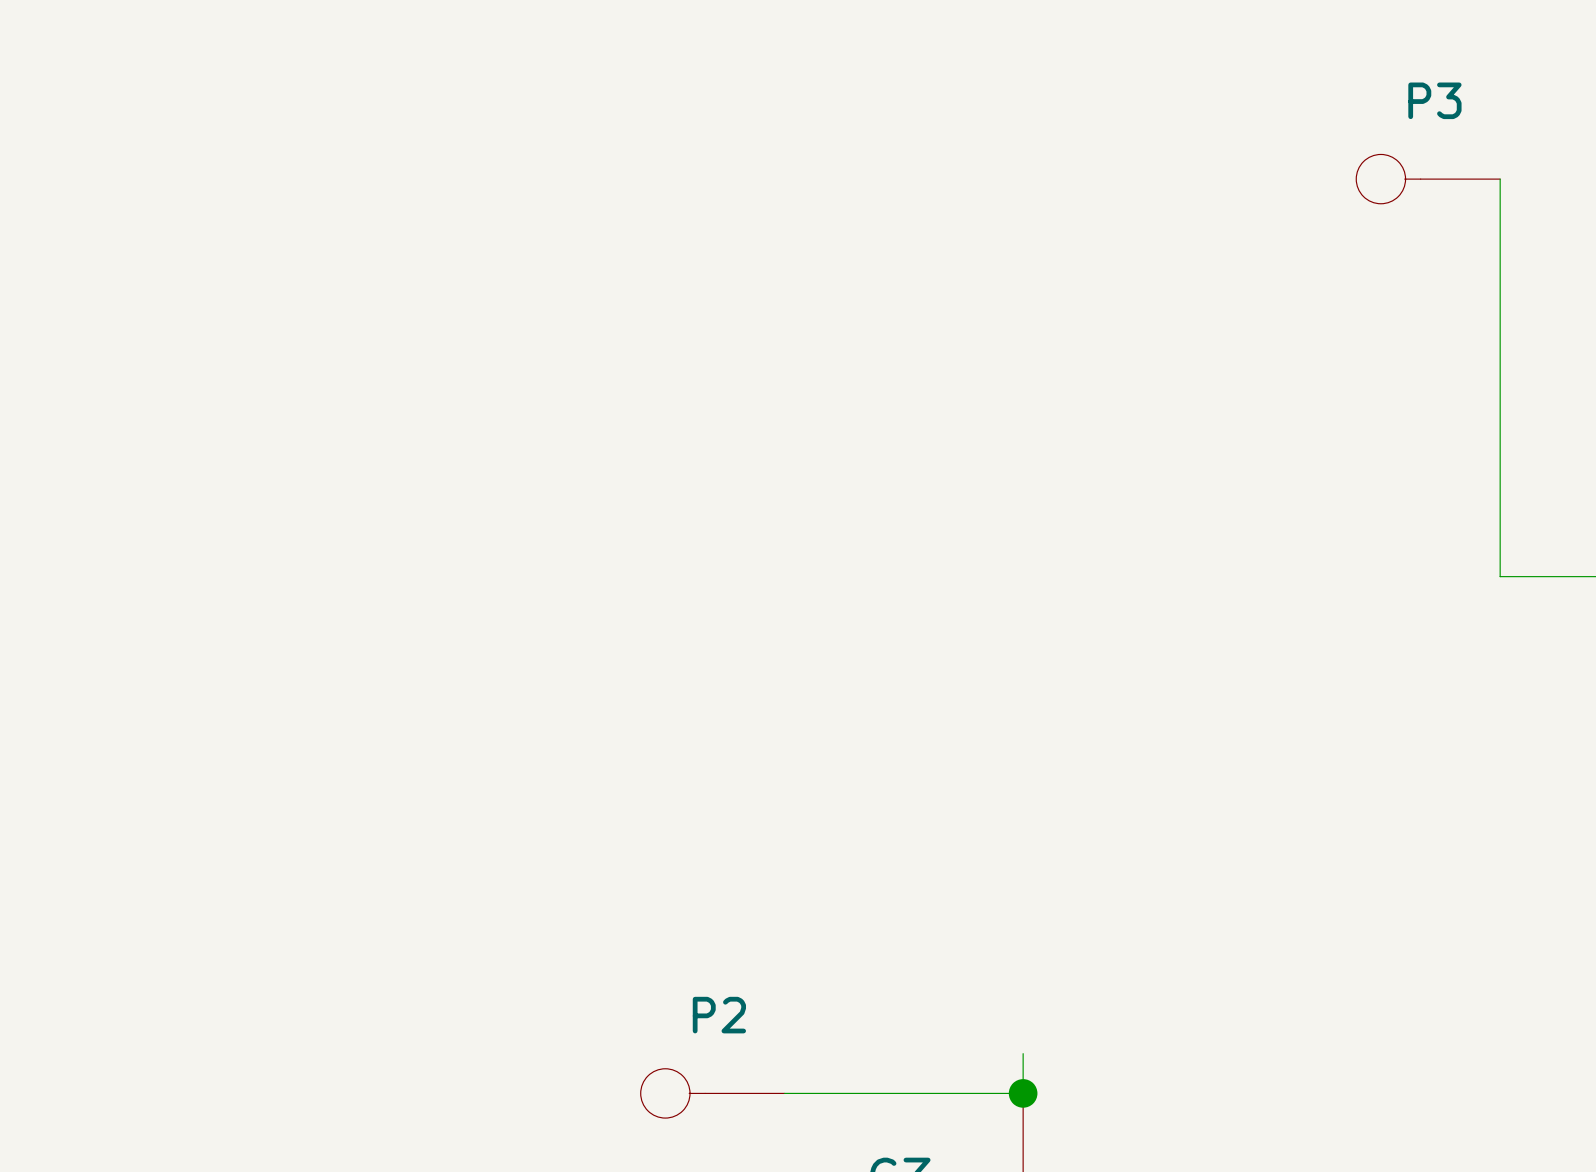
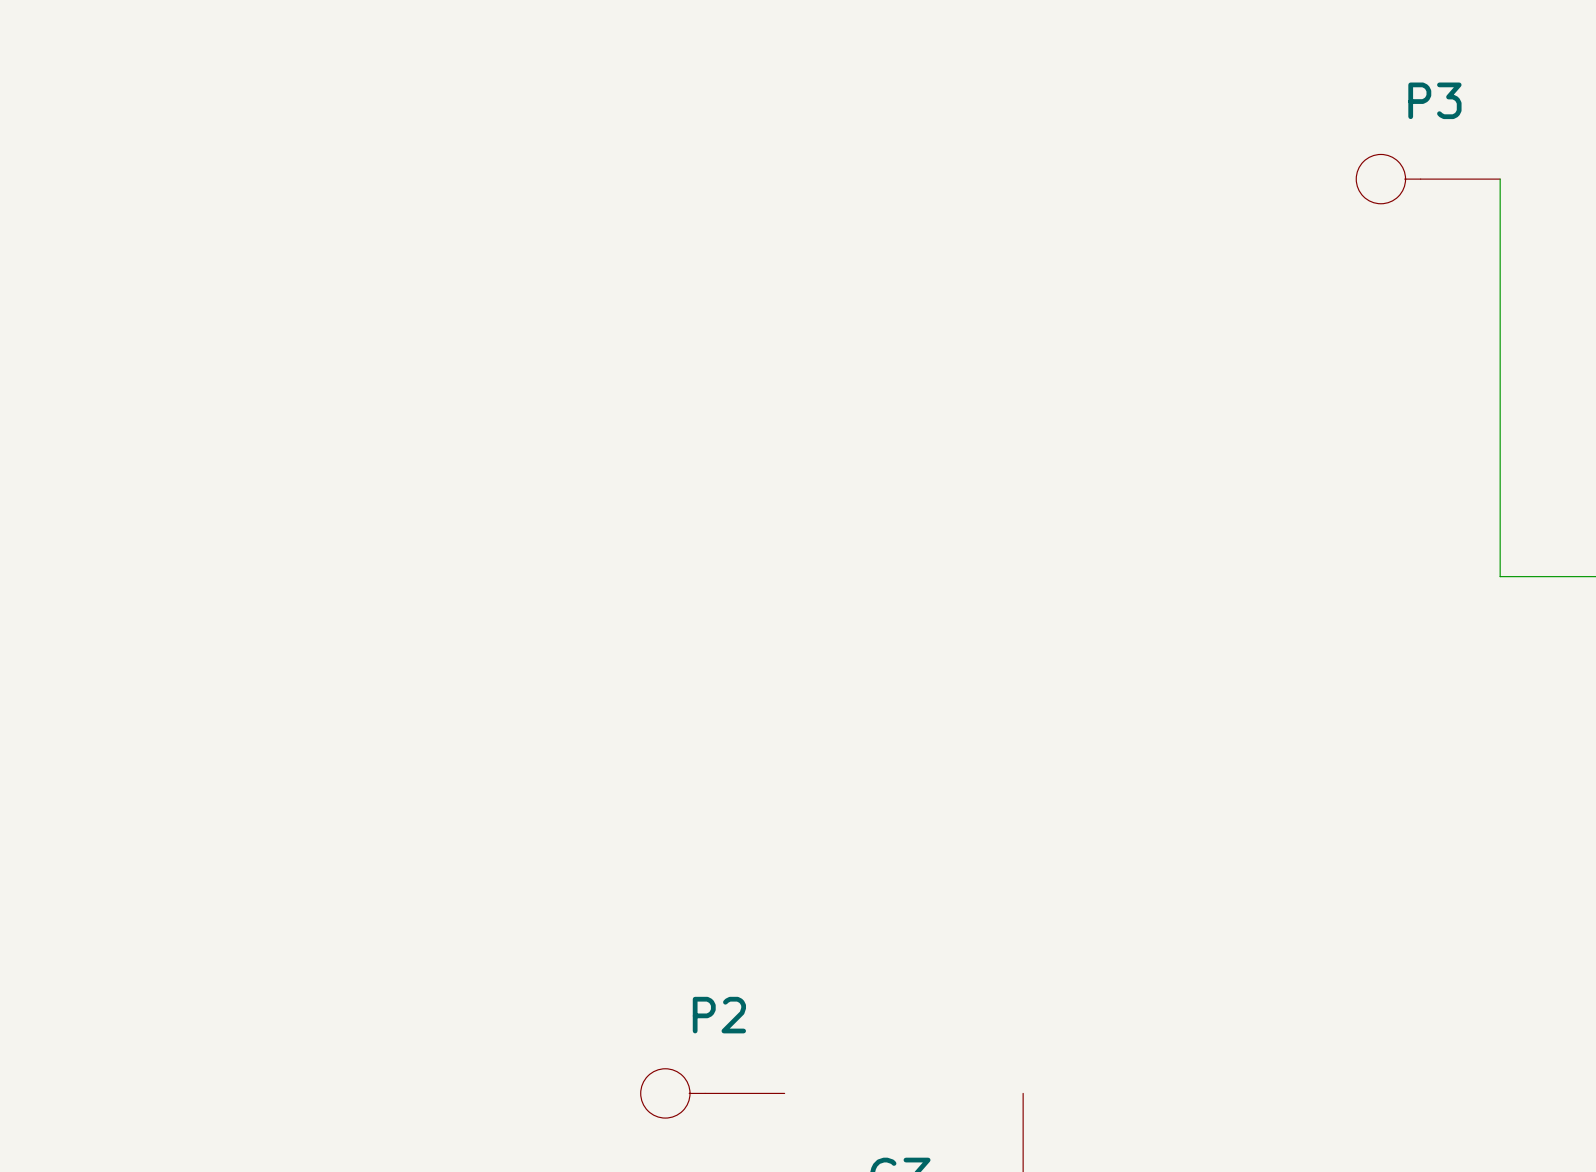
wire: (1023, 1053) (1023, 1093) (784, 1093) -> none
junction: (1023, 1093) -> none

